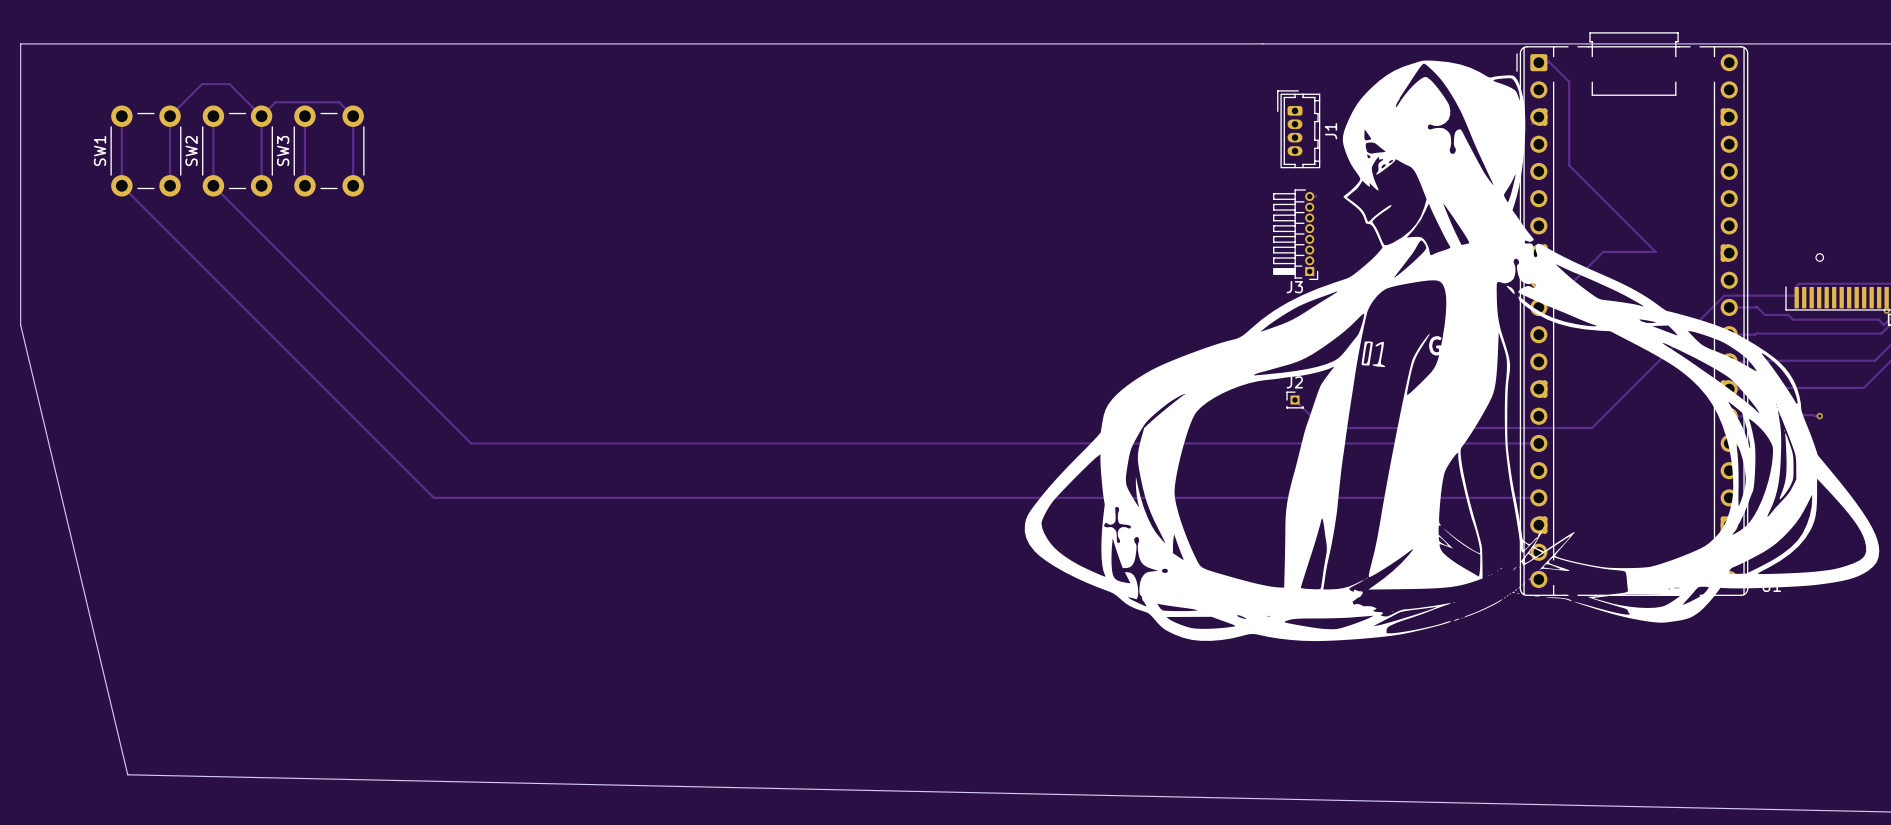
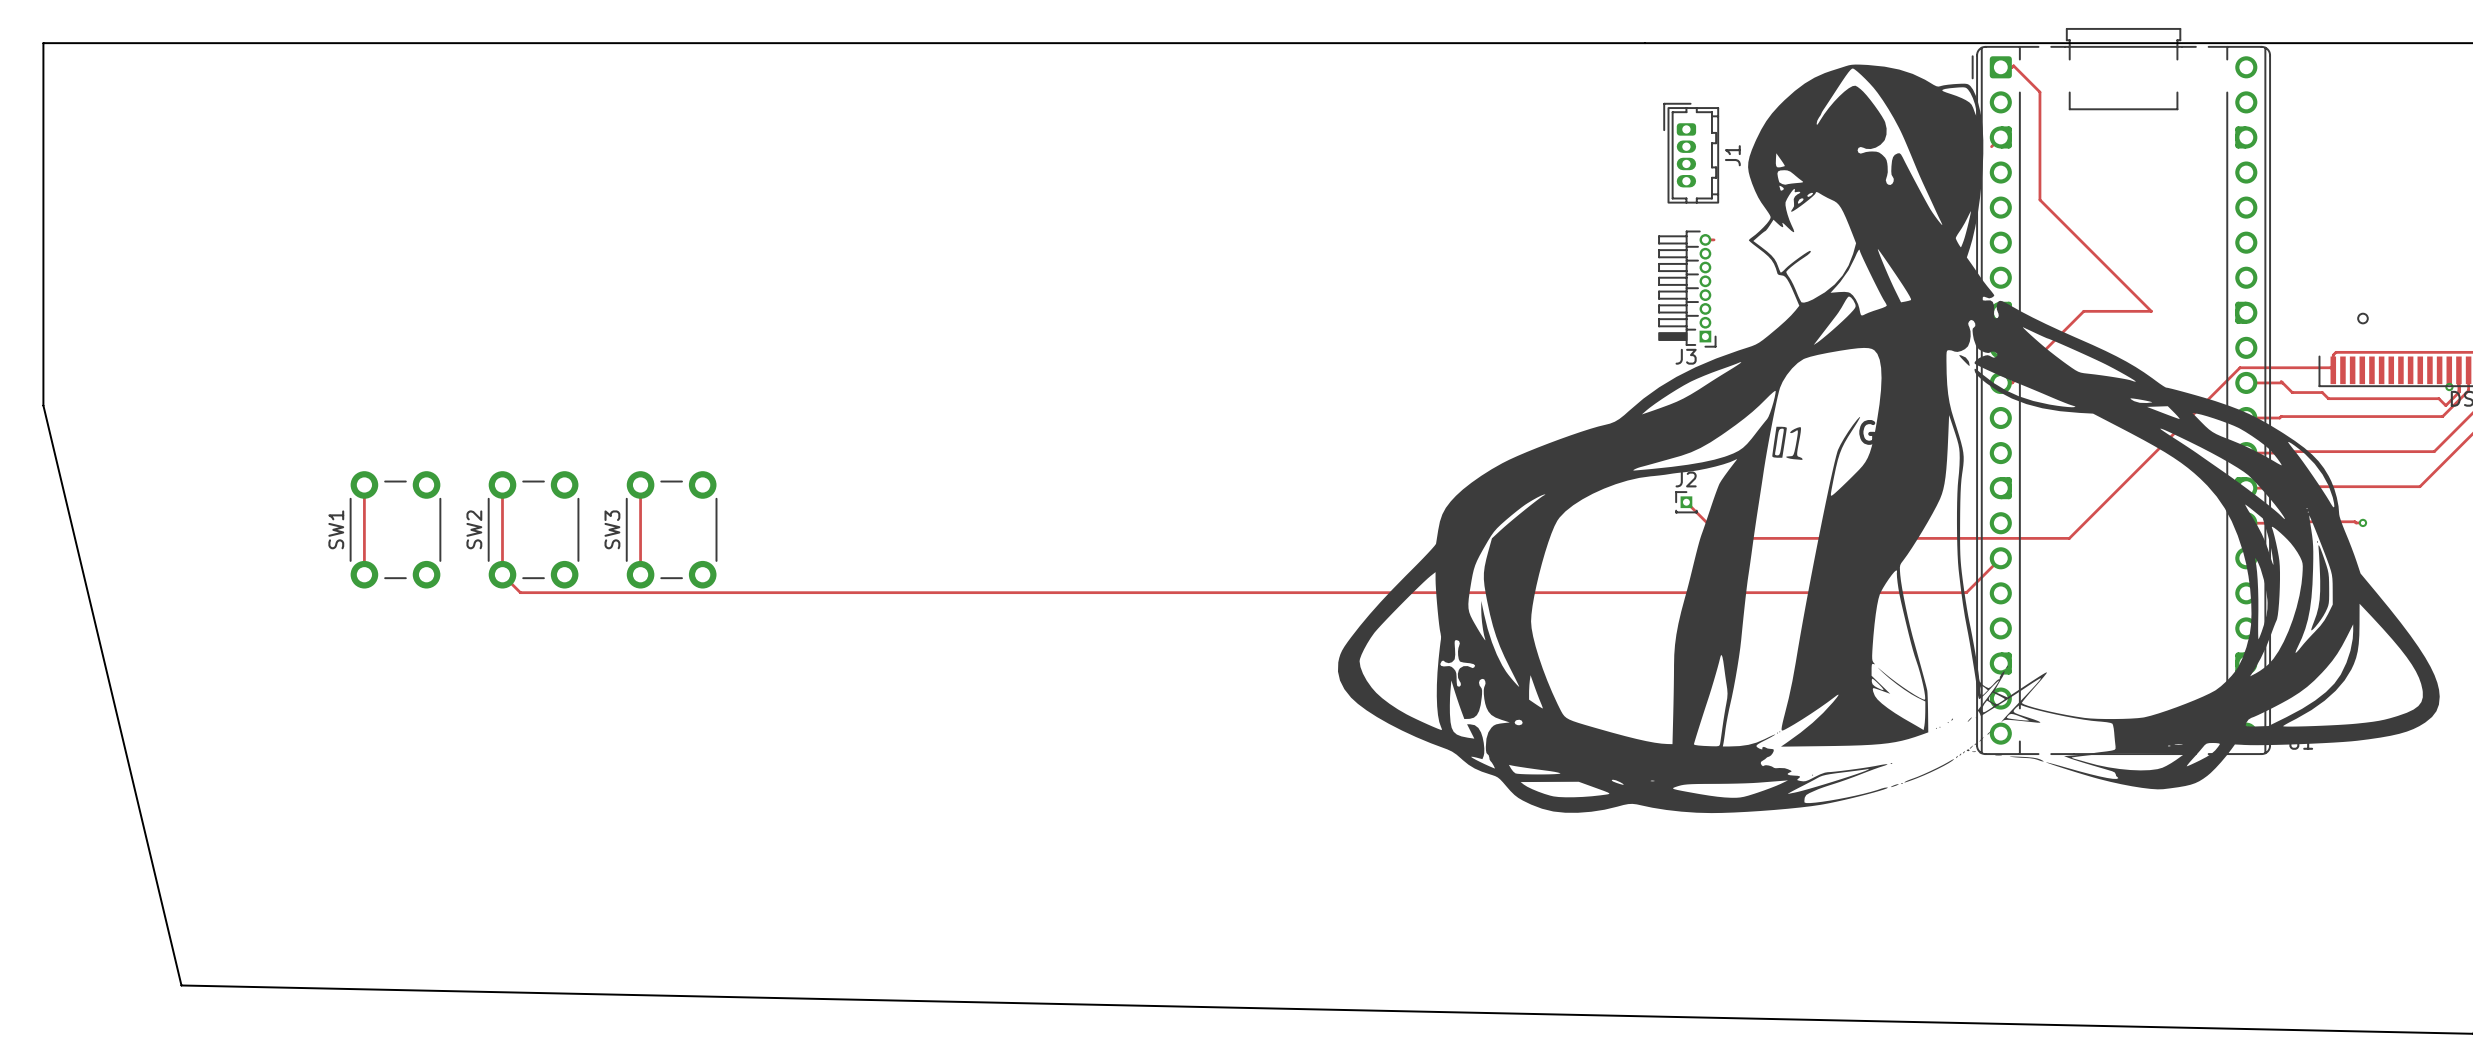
track: (121, 116) (121, 185) (433, 497) (1538, 497) -> none
track: (213, 116) (213, 185) (471, 443) (1538, 443) -> (502, 484) (502, 574) (520, 592) (1966, 592) (2000, 558)
track: (261, 116) (275, 102) (339, 102) (353, 116) (353, 185) -> none
track: (261, 116) (229, 84) (202, 84) (170, 116) (170, 185) -> none
track: (261, 116) (261, 185) -> none
track: (304, 116) (304, 185) -> none
SW1 position: (145, 151) -> (395, 529)
SW2 position: (237, 151) -> (533, 529)
SW3 position: (329, 151) -> (671, 529)
track: none -> (364, 484) (364, 574)
track: none -> (640, 484) (640, 574)

